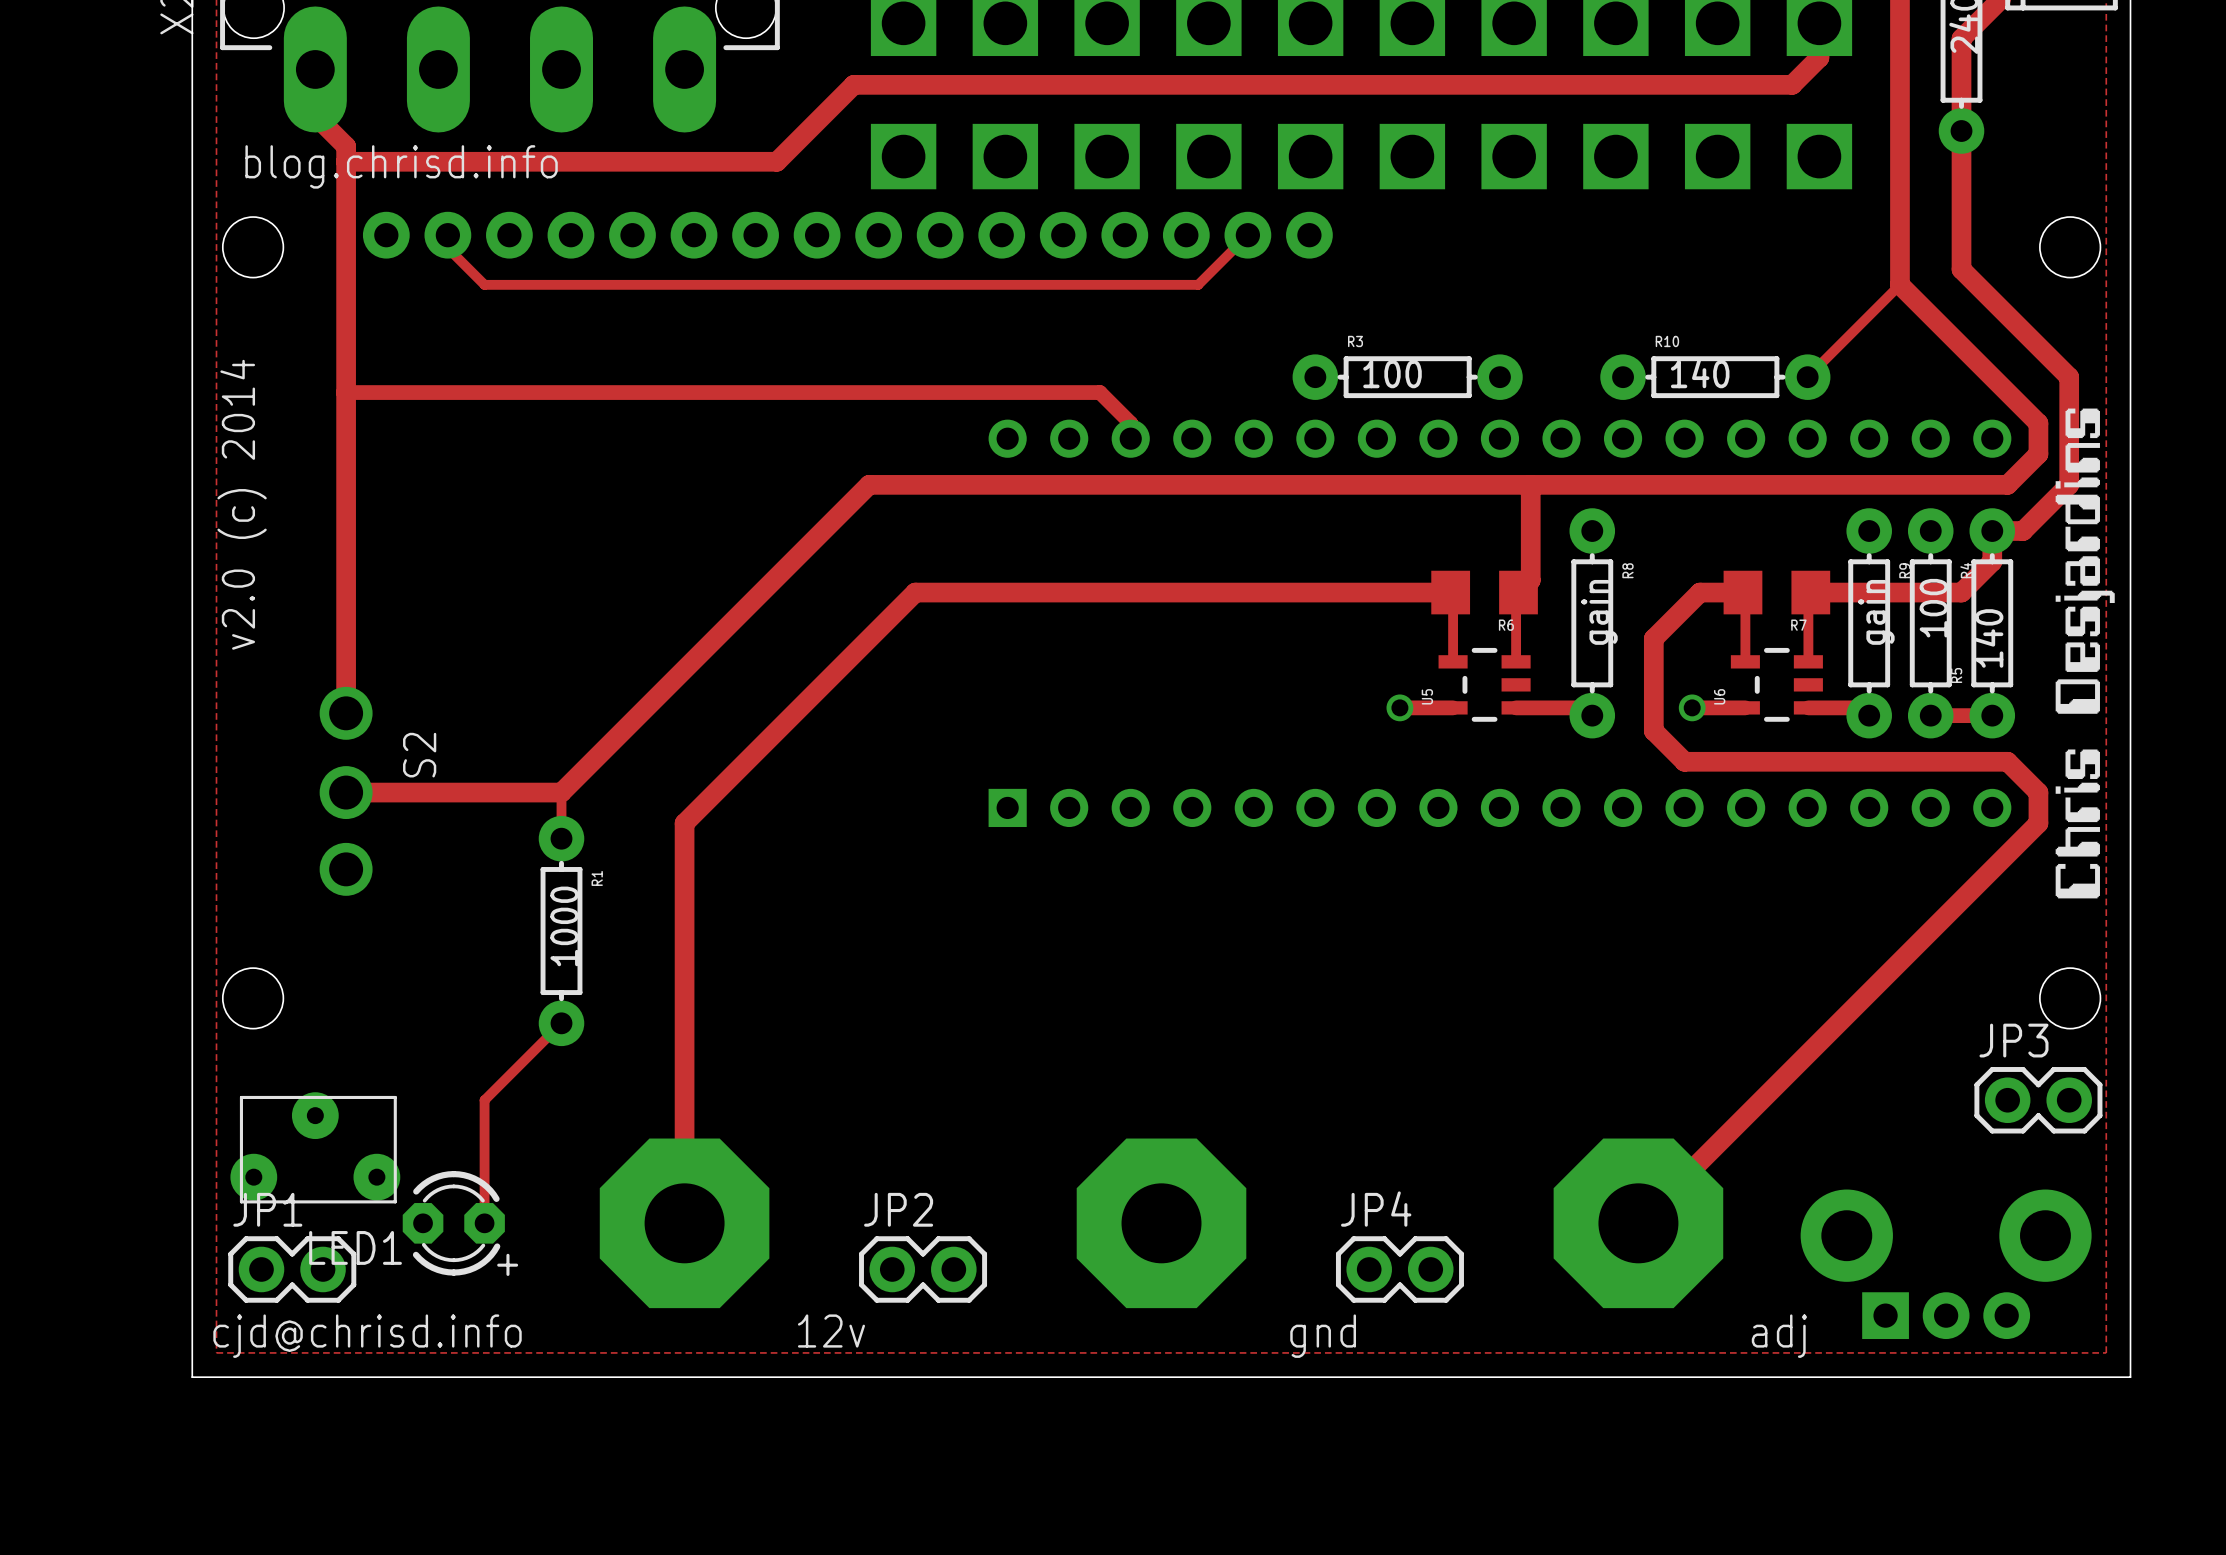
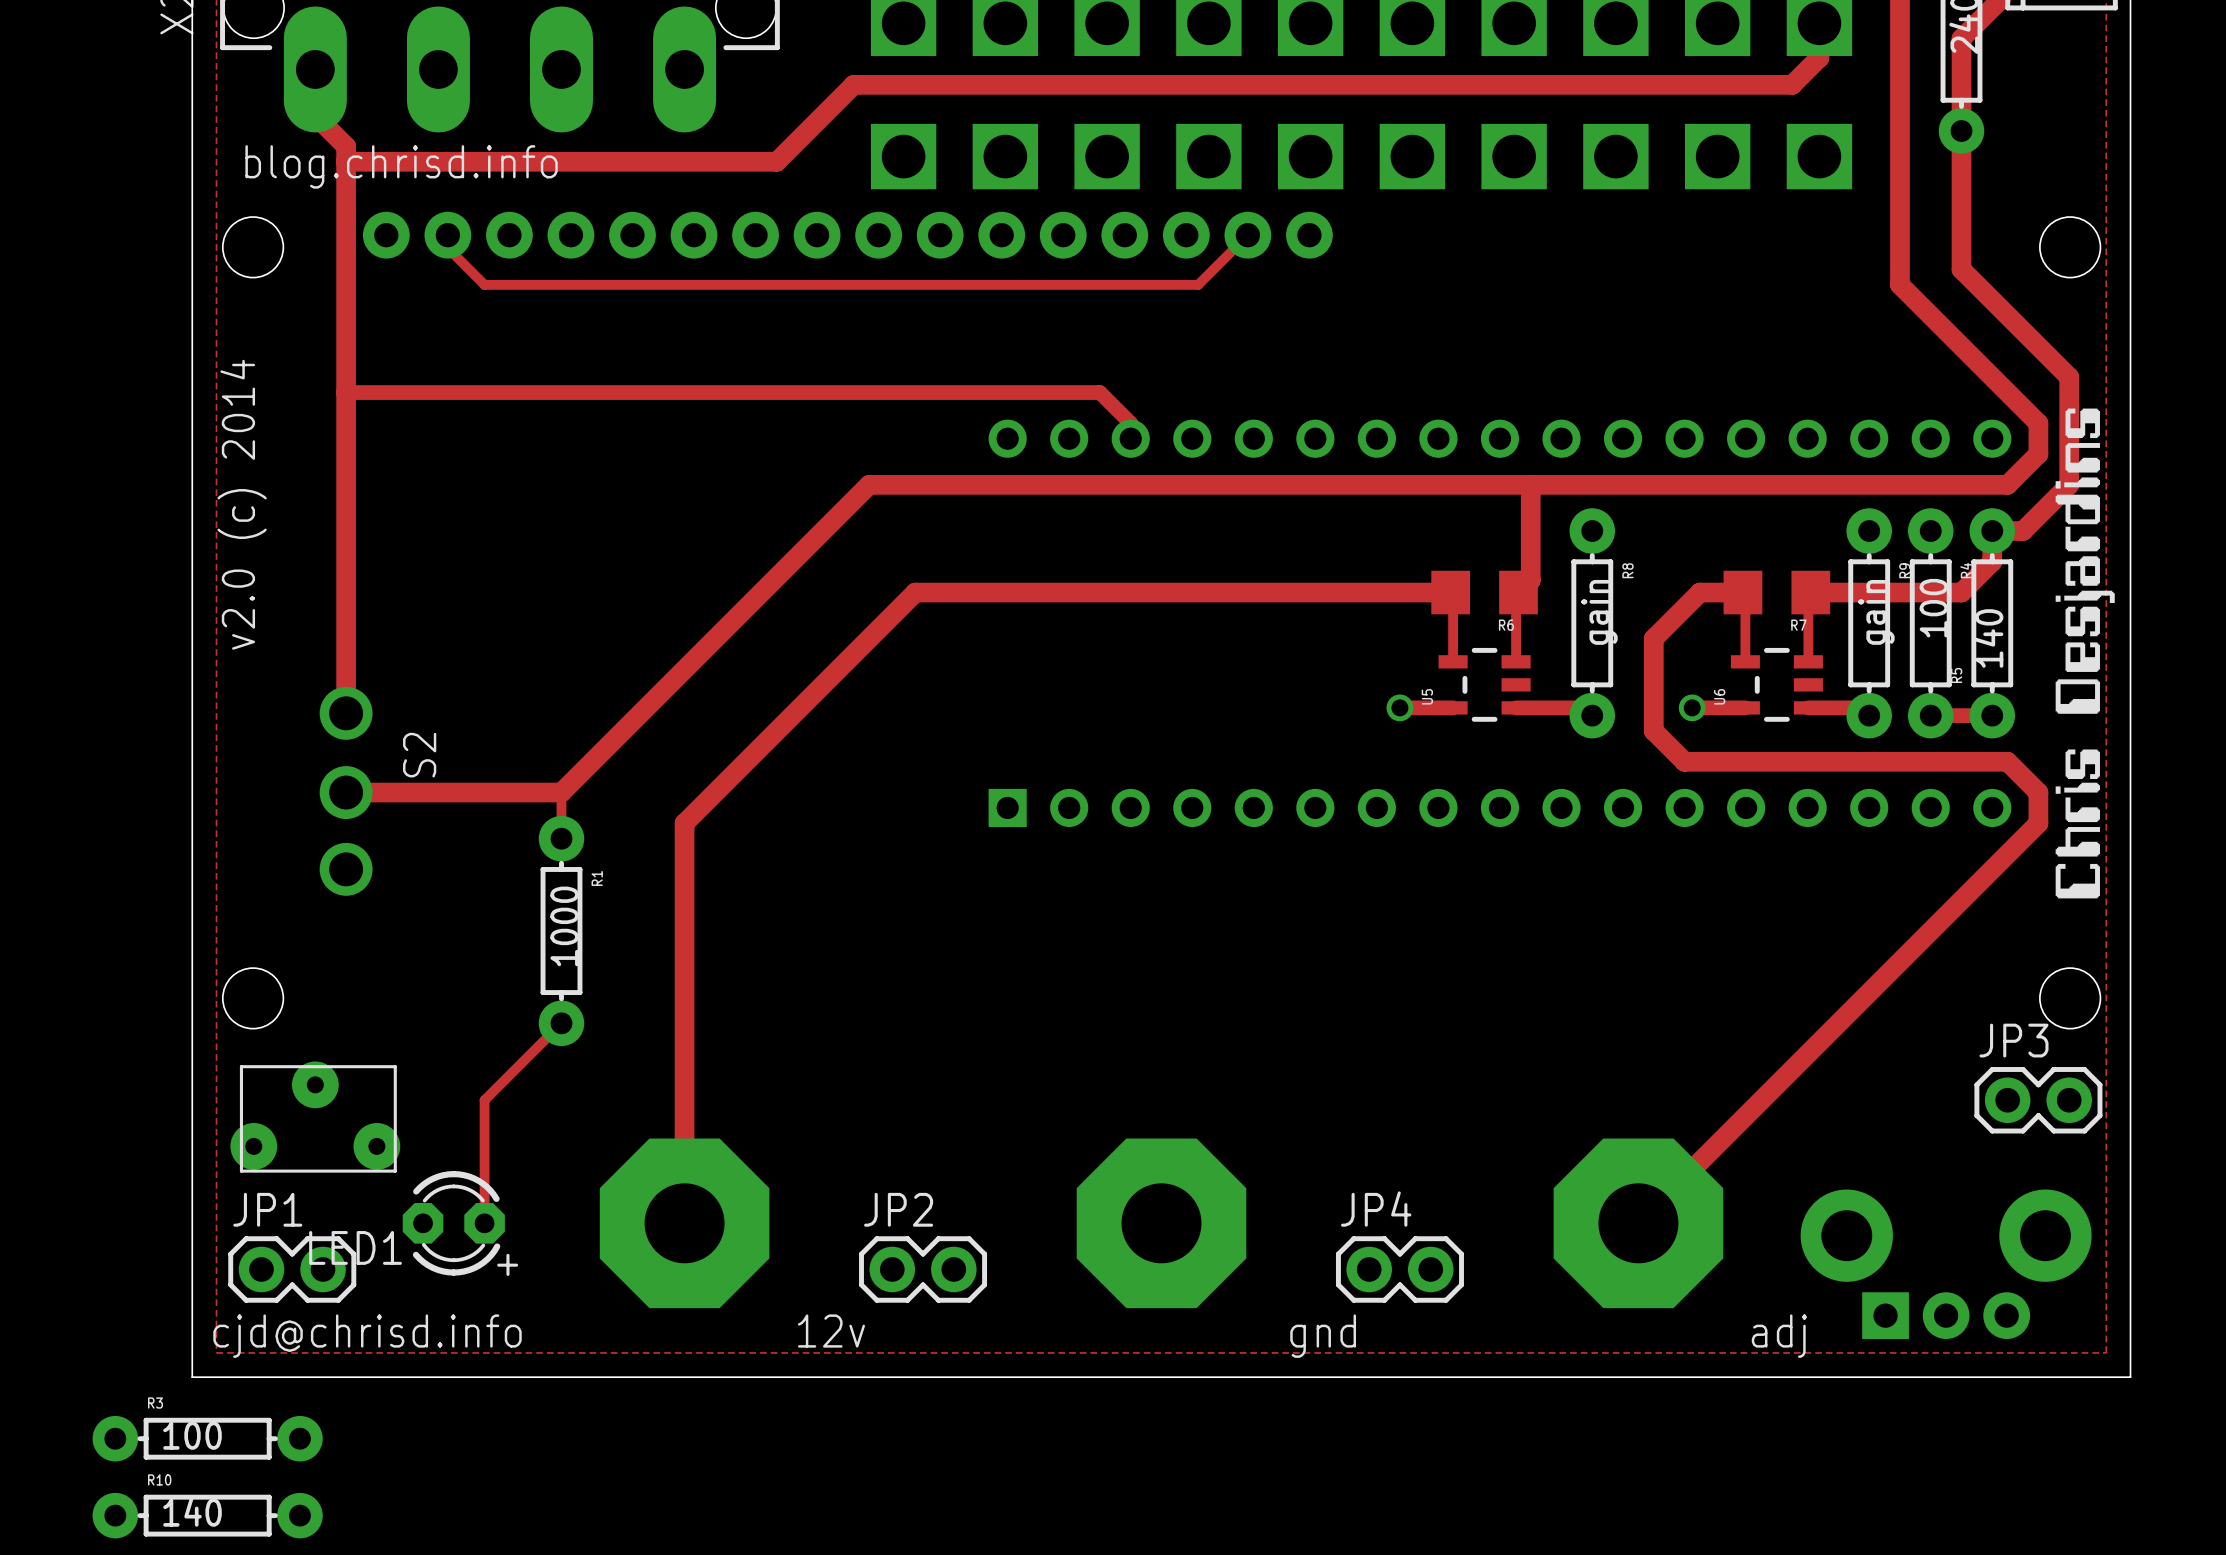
track: (1899, 284) (1807, 377) -> none
R3 position: (1407, 377) -> (207, 1438)
R10 position: (1715, 377) -> (207, 1515)
part position: (315, 1147) -> (315, 1117)

